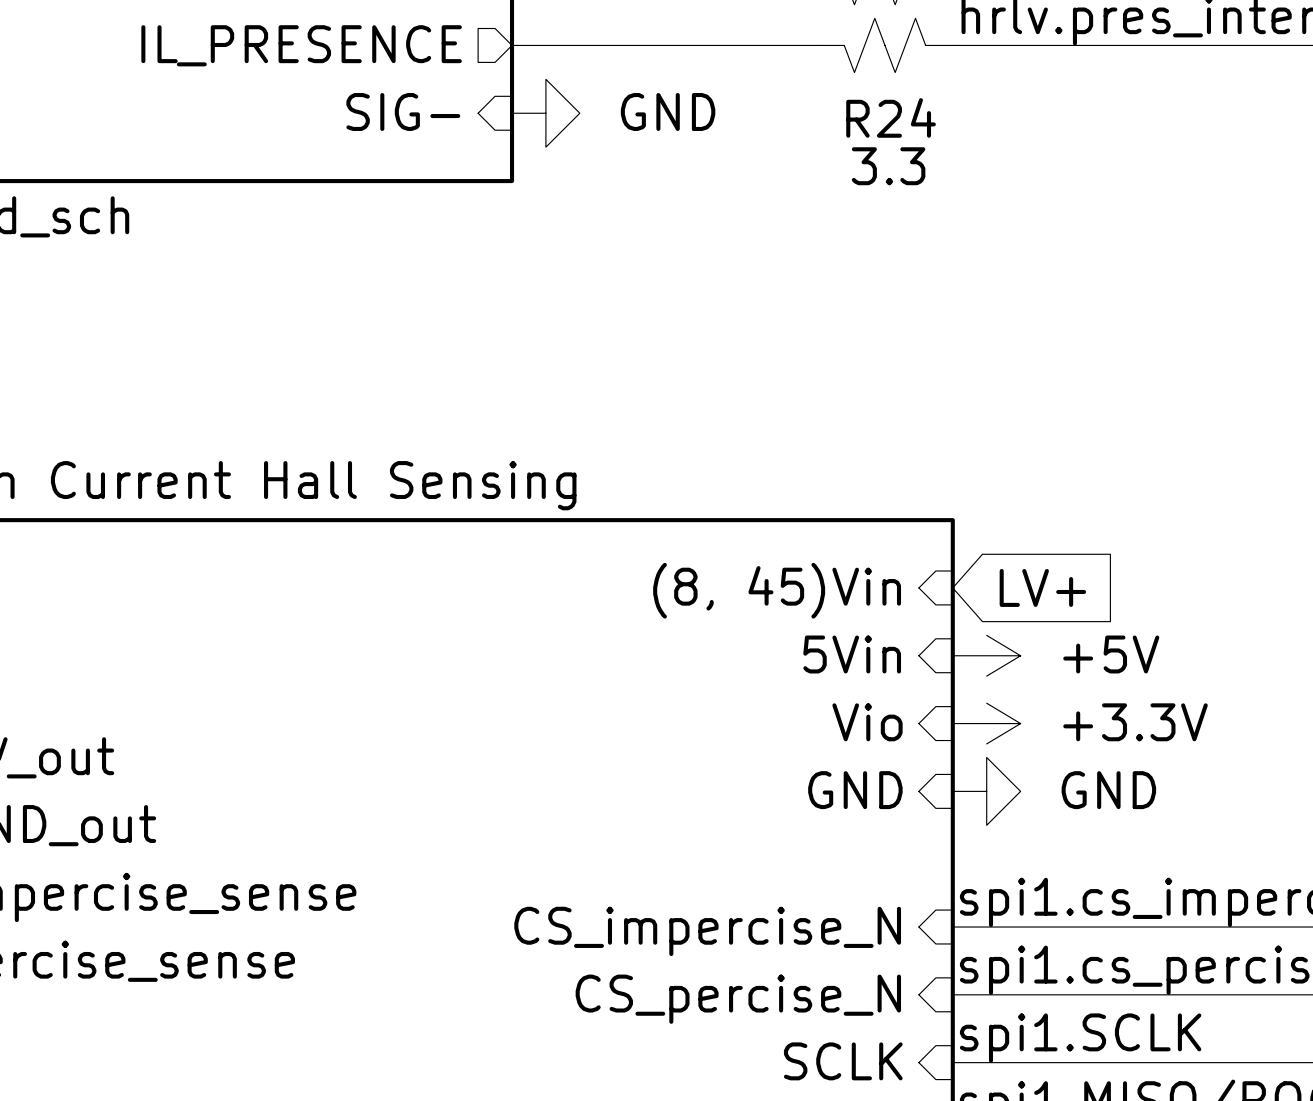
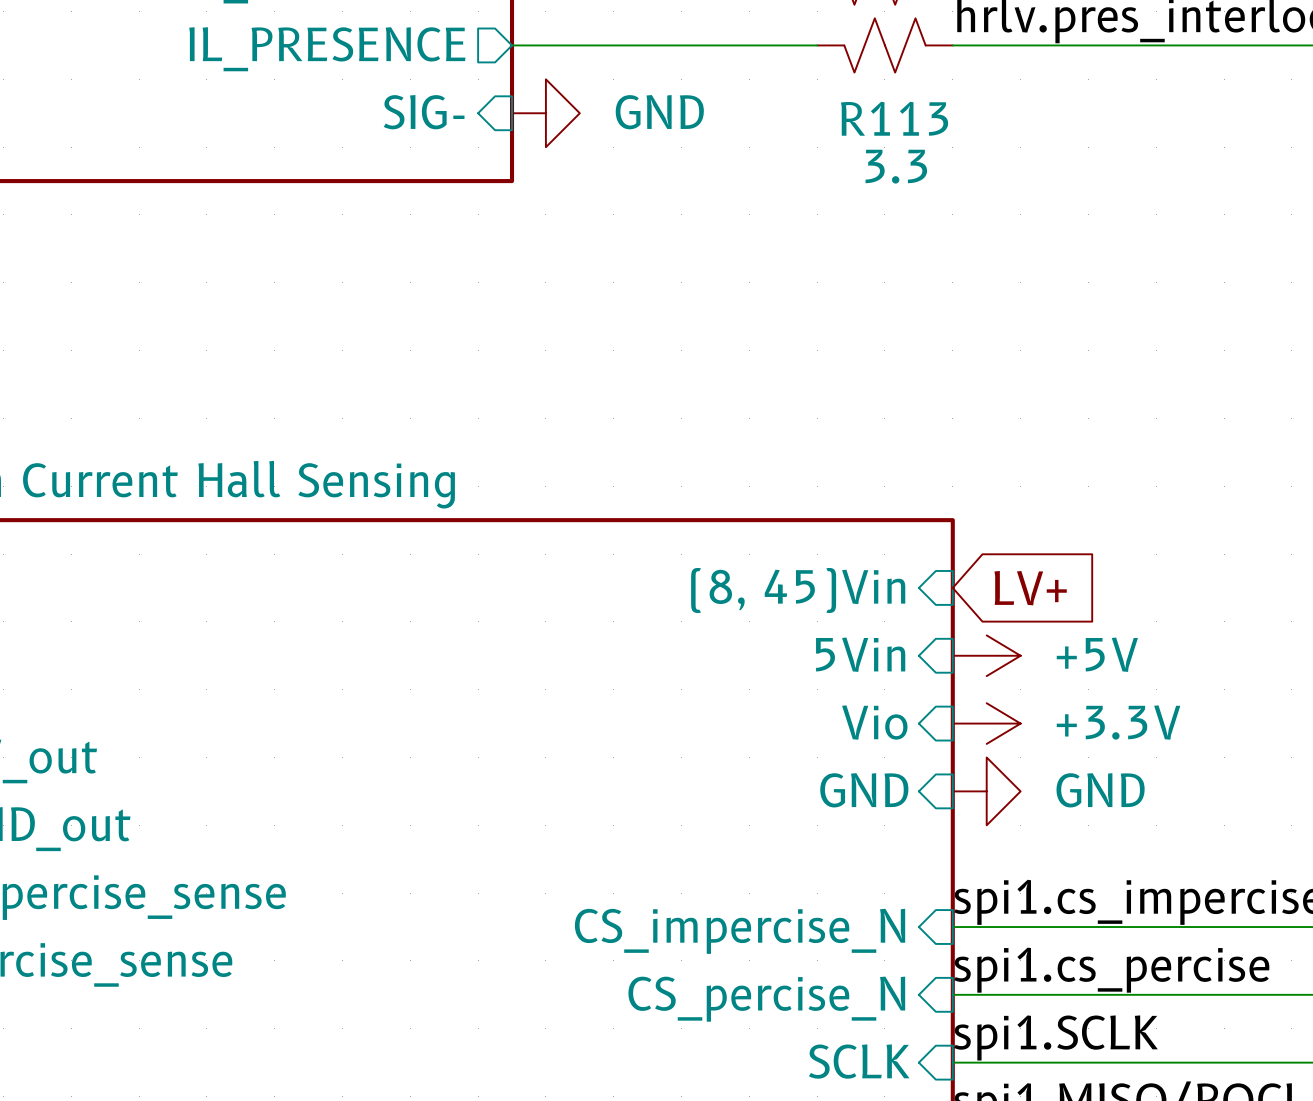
R24 name: R24 (891, 117) -> R113 (894, 118)

